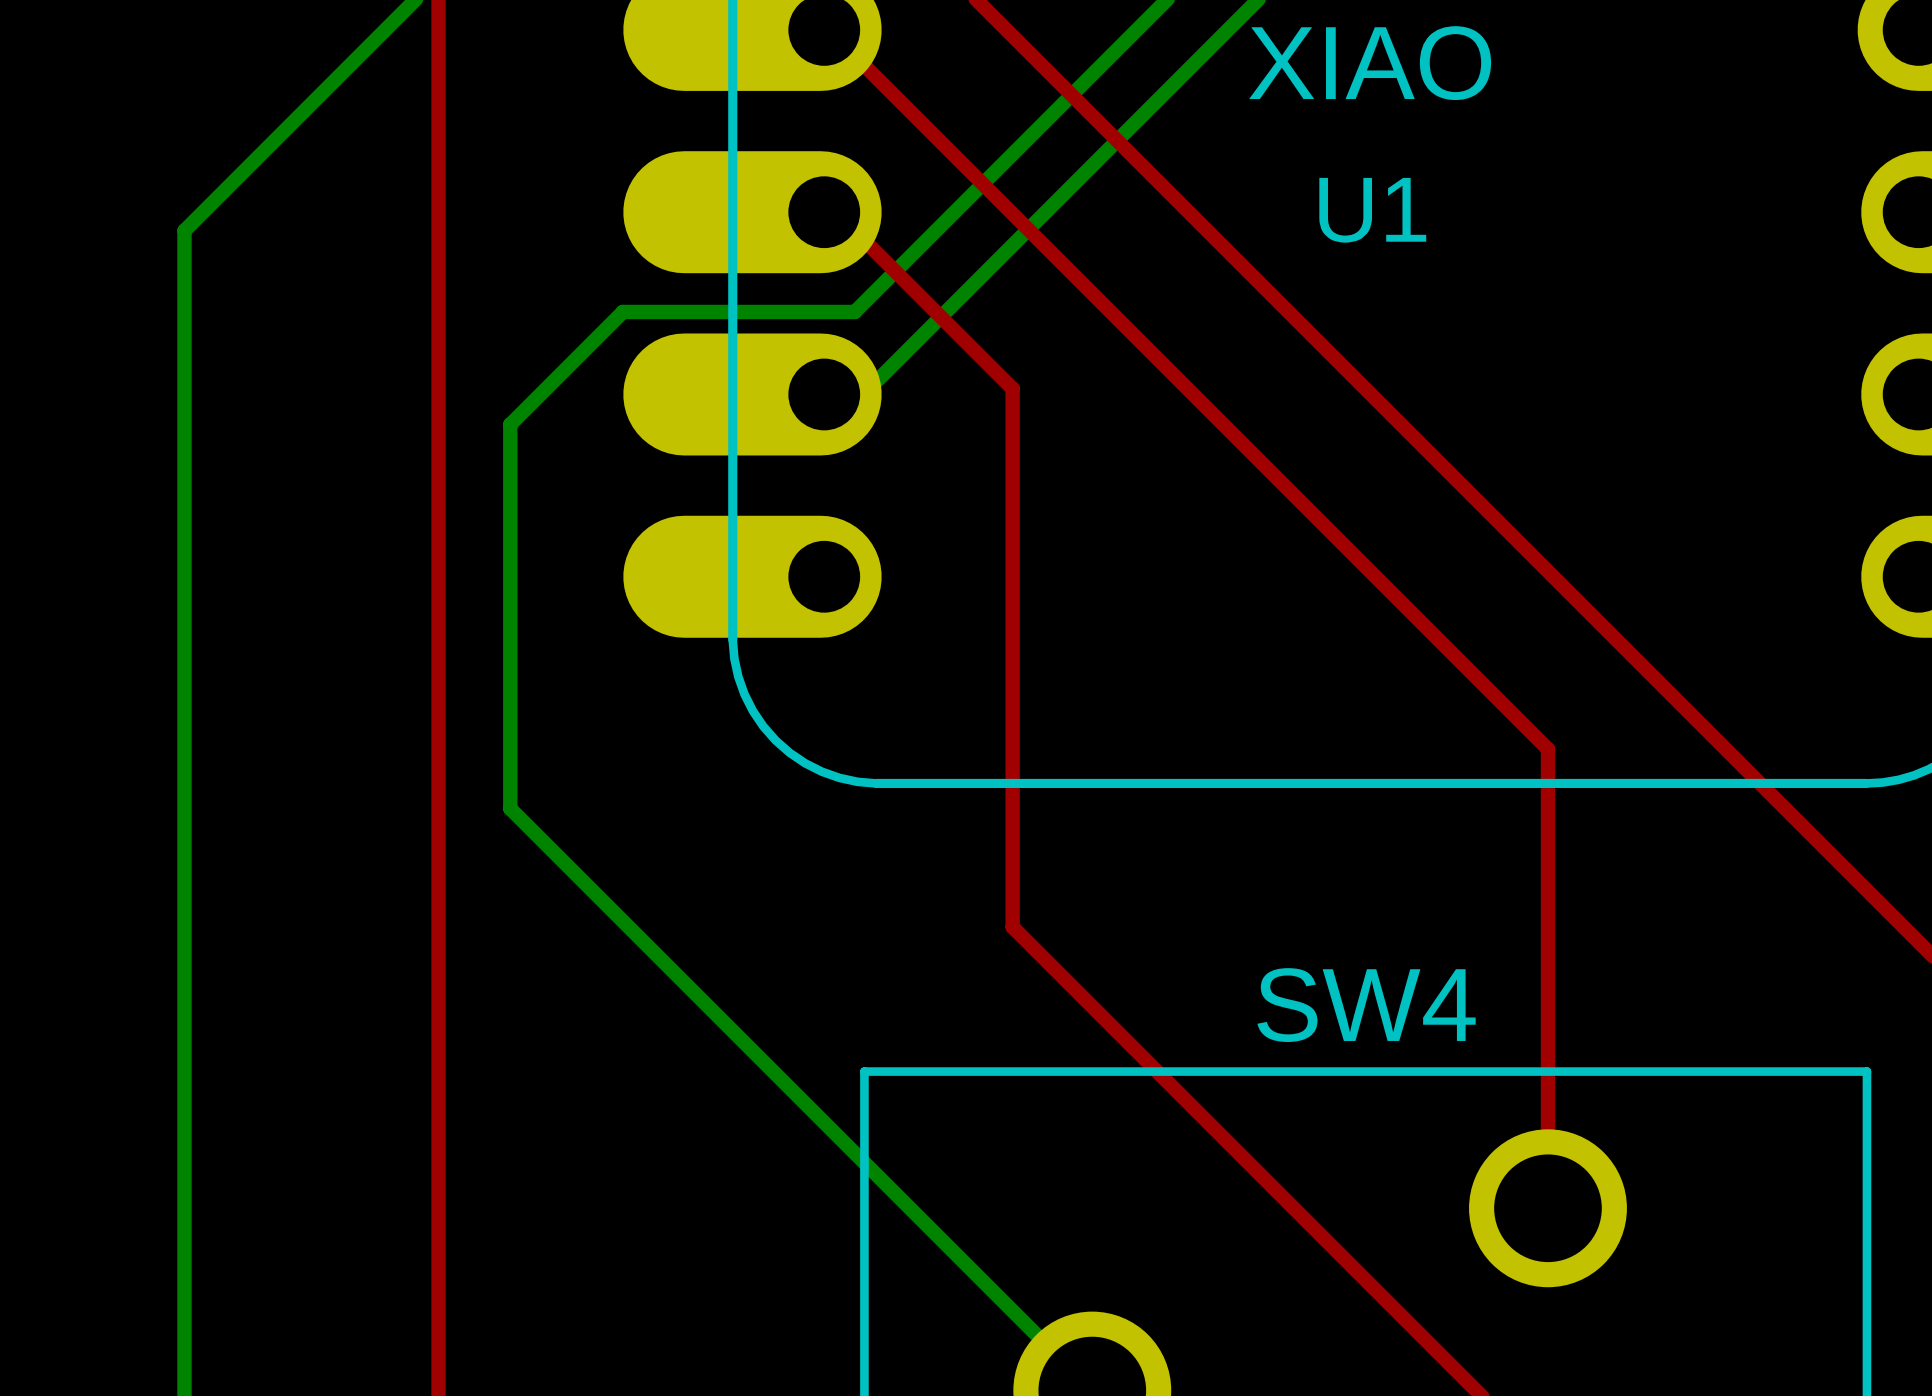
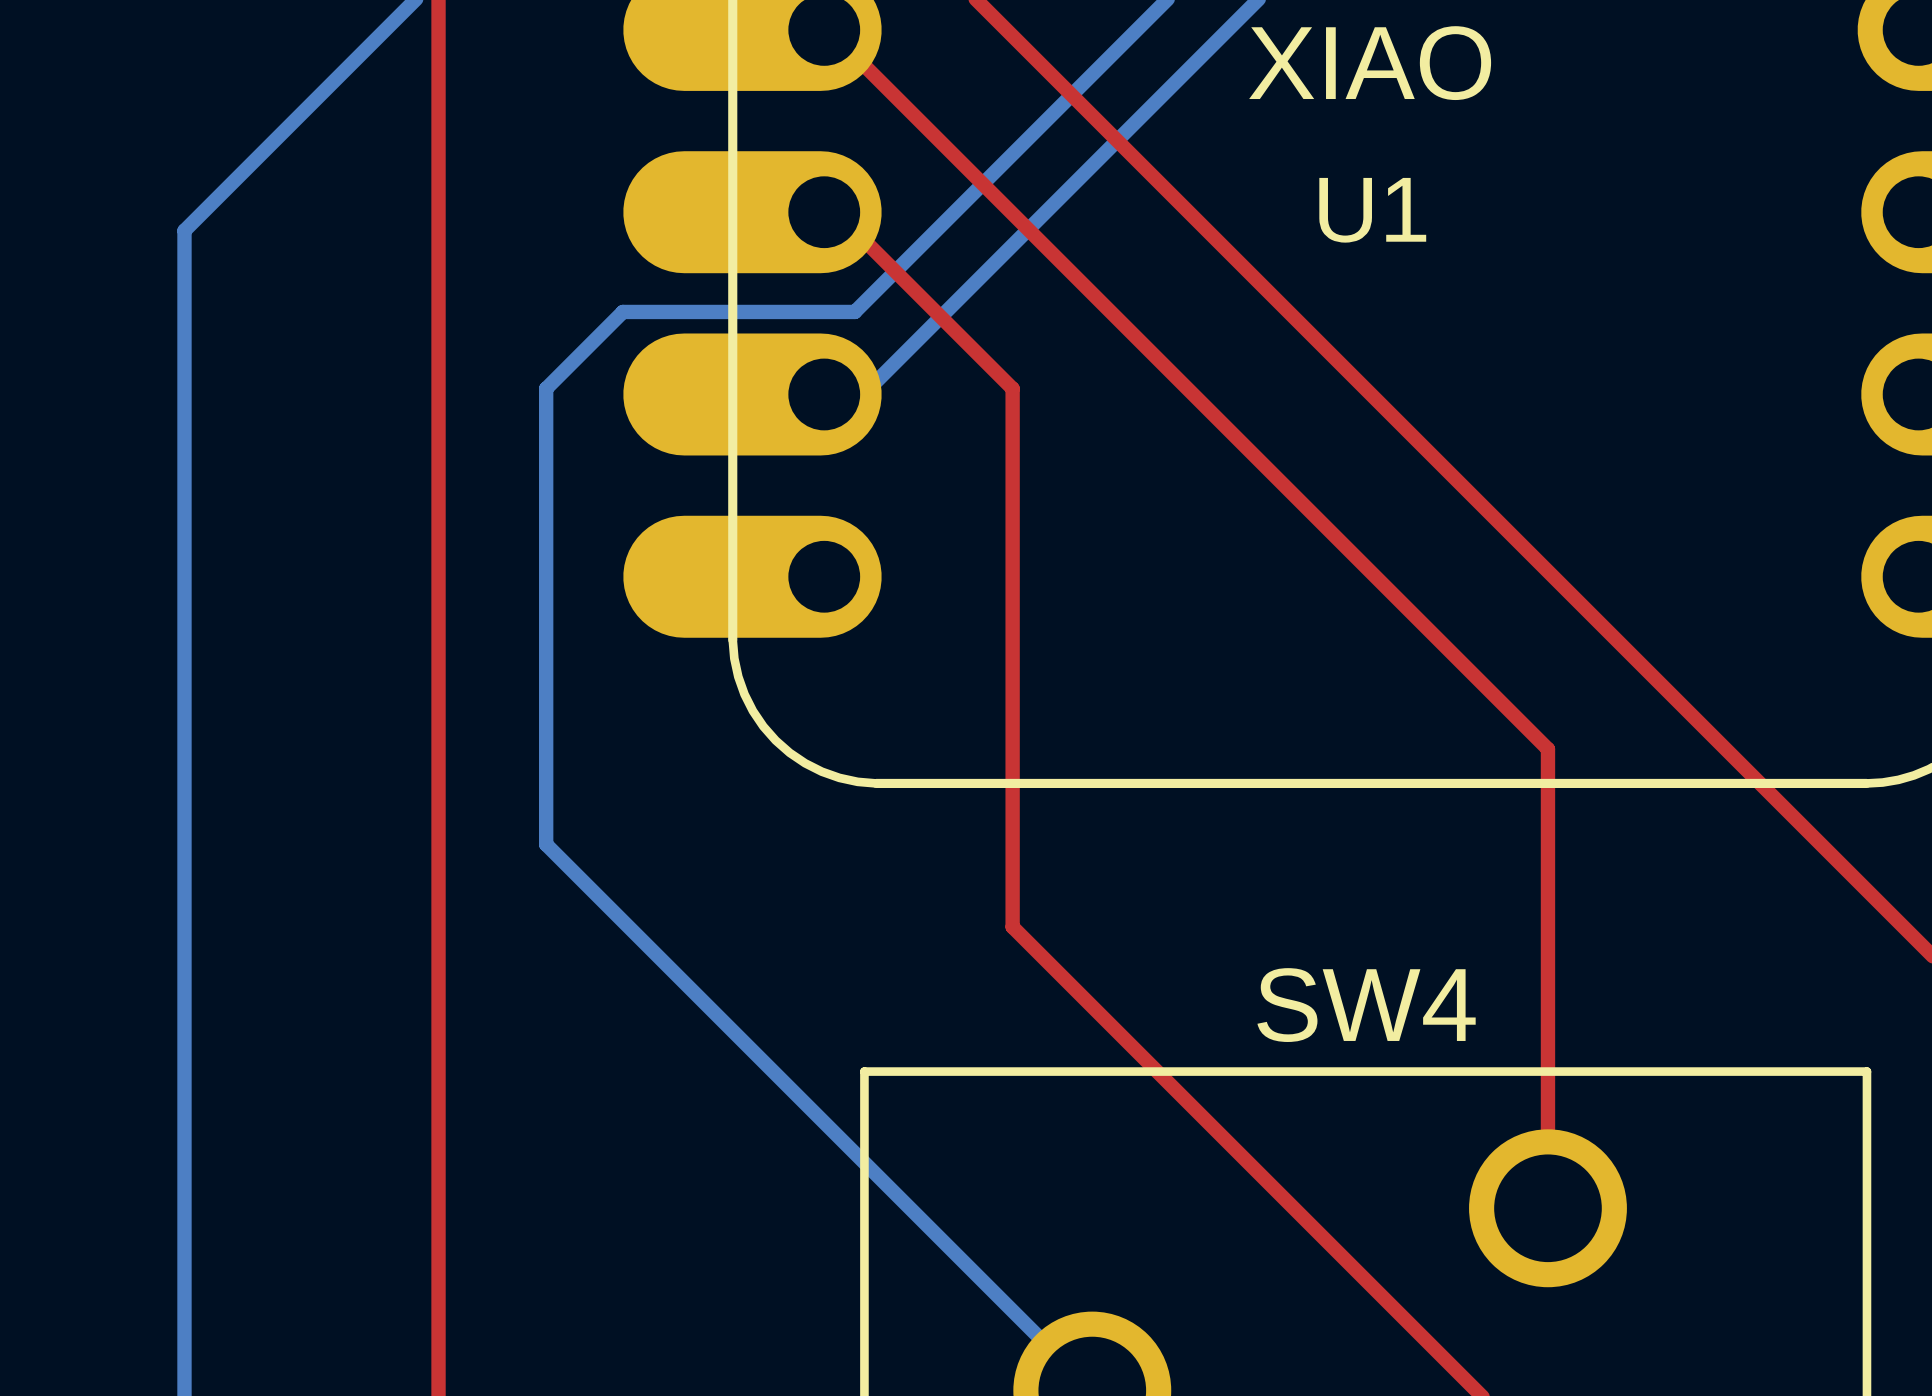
bottom track: (546, 388) (510, 424) (510, 808) (546, 844) -> (546, 388) (546, 844)

